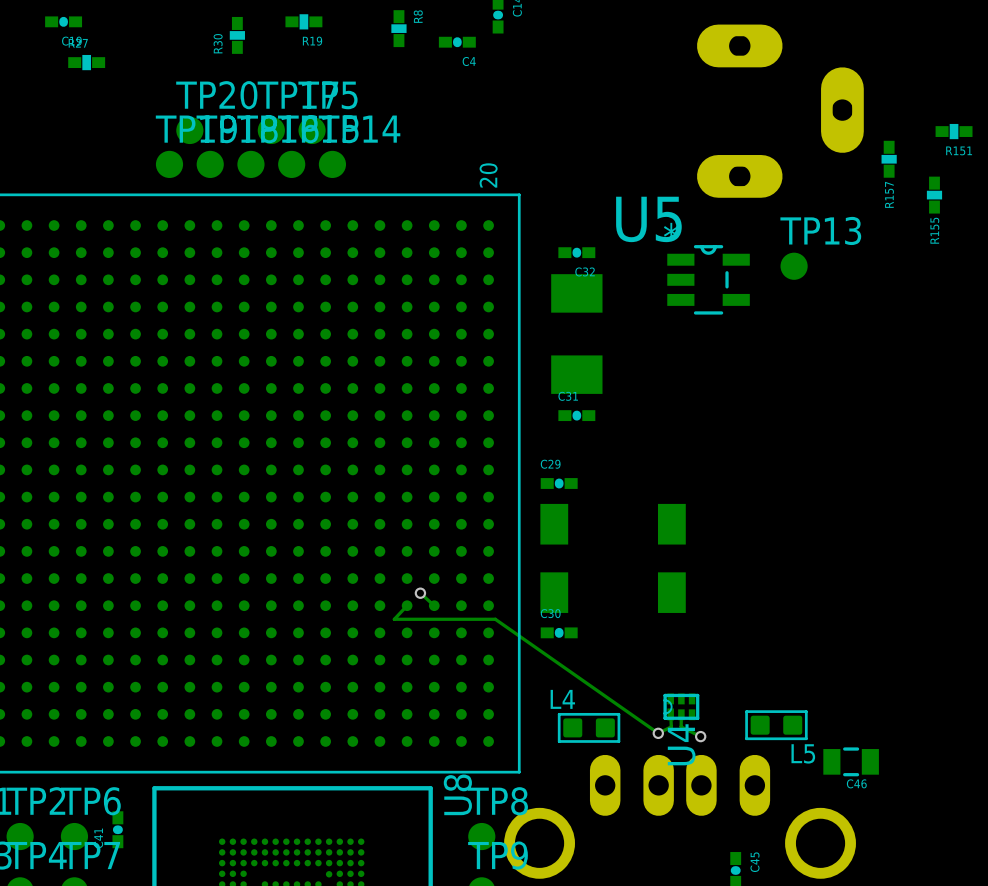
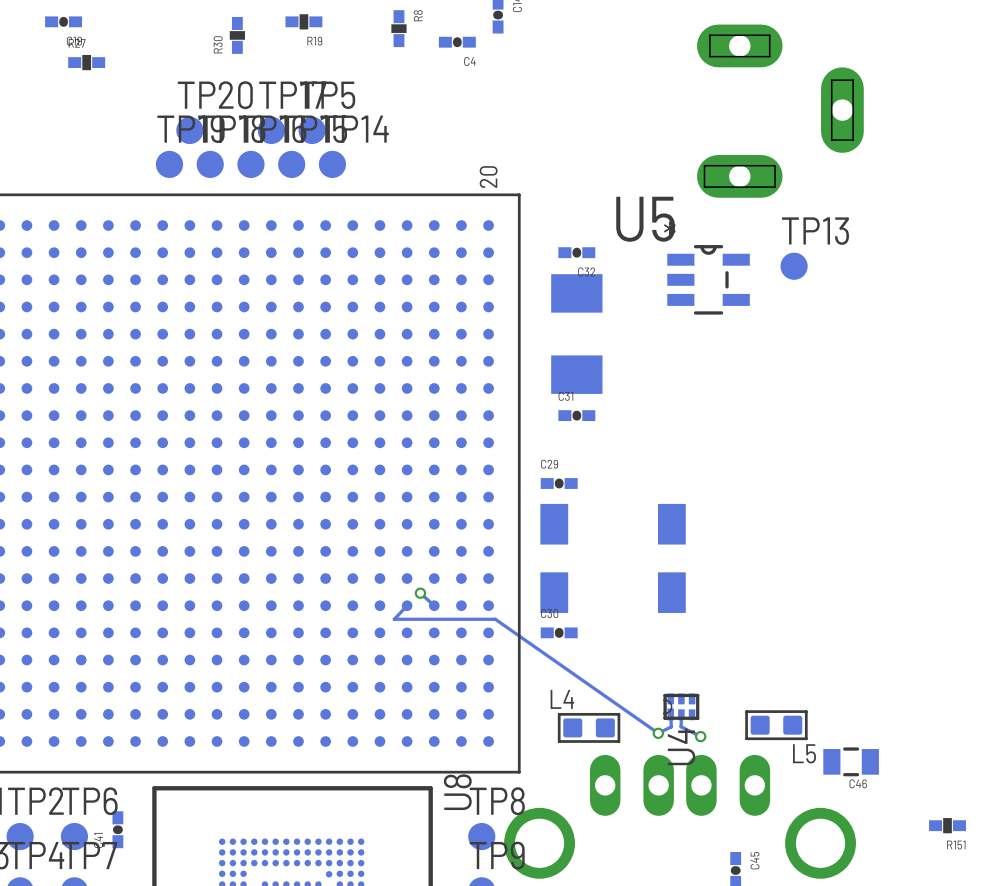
R151 position: (954, 131) -> (947, 825)
R157: (889, 159) -> none
R155: (934, 195) -> none

